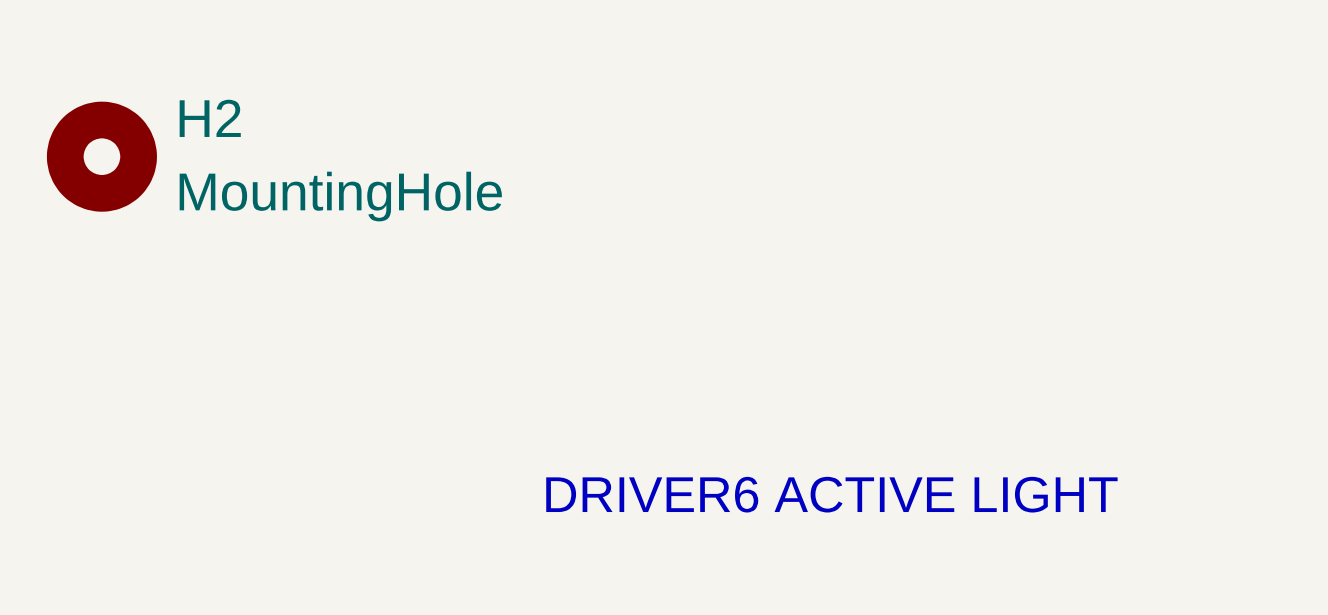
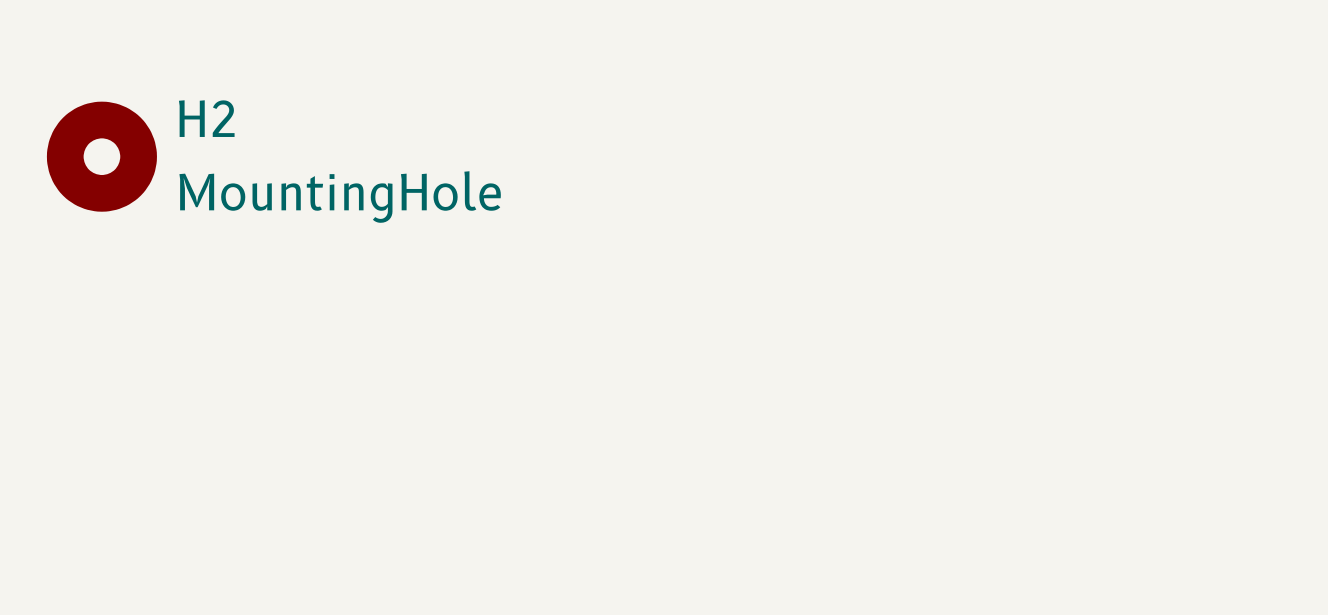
text: DRIVER6 ACTIVE LIGHT (831, 494) -> none

